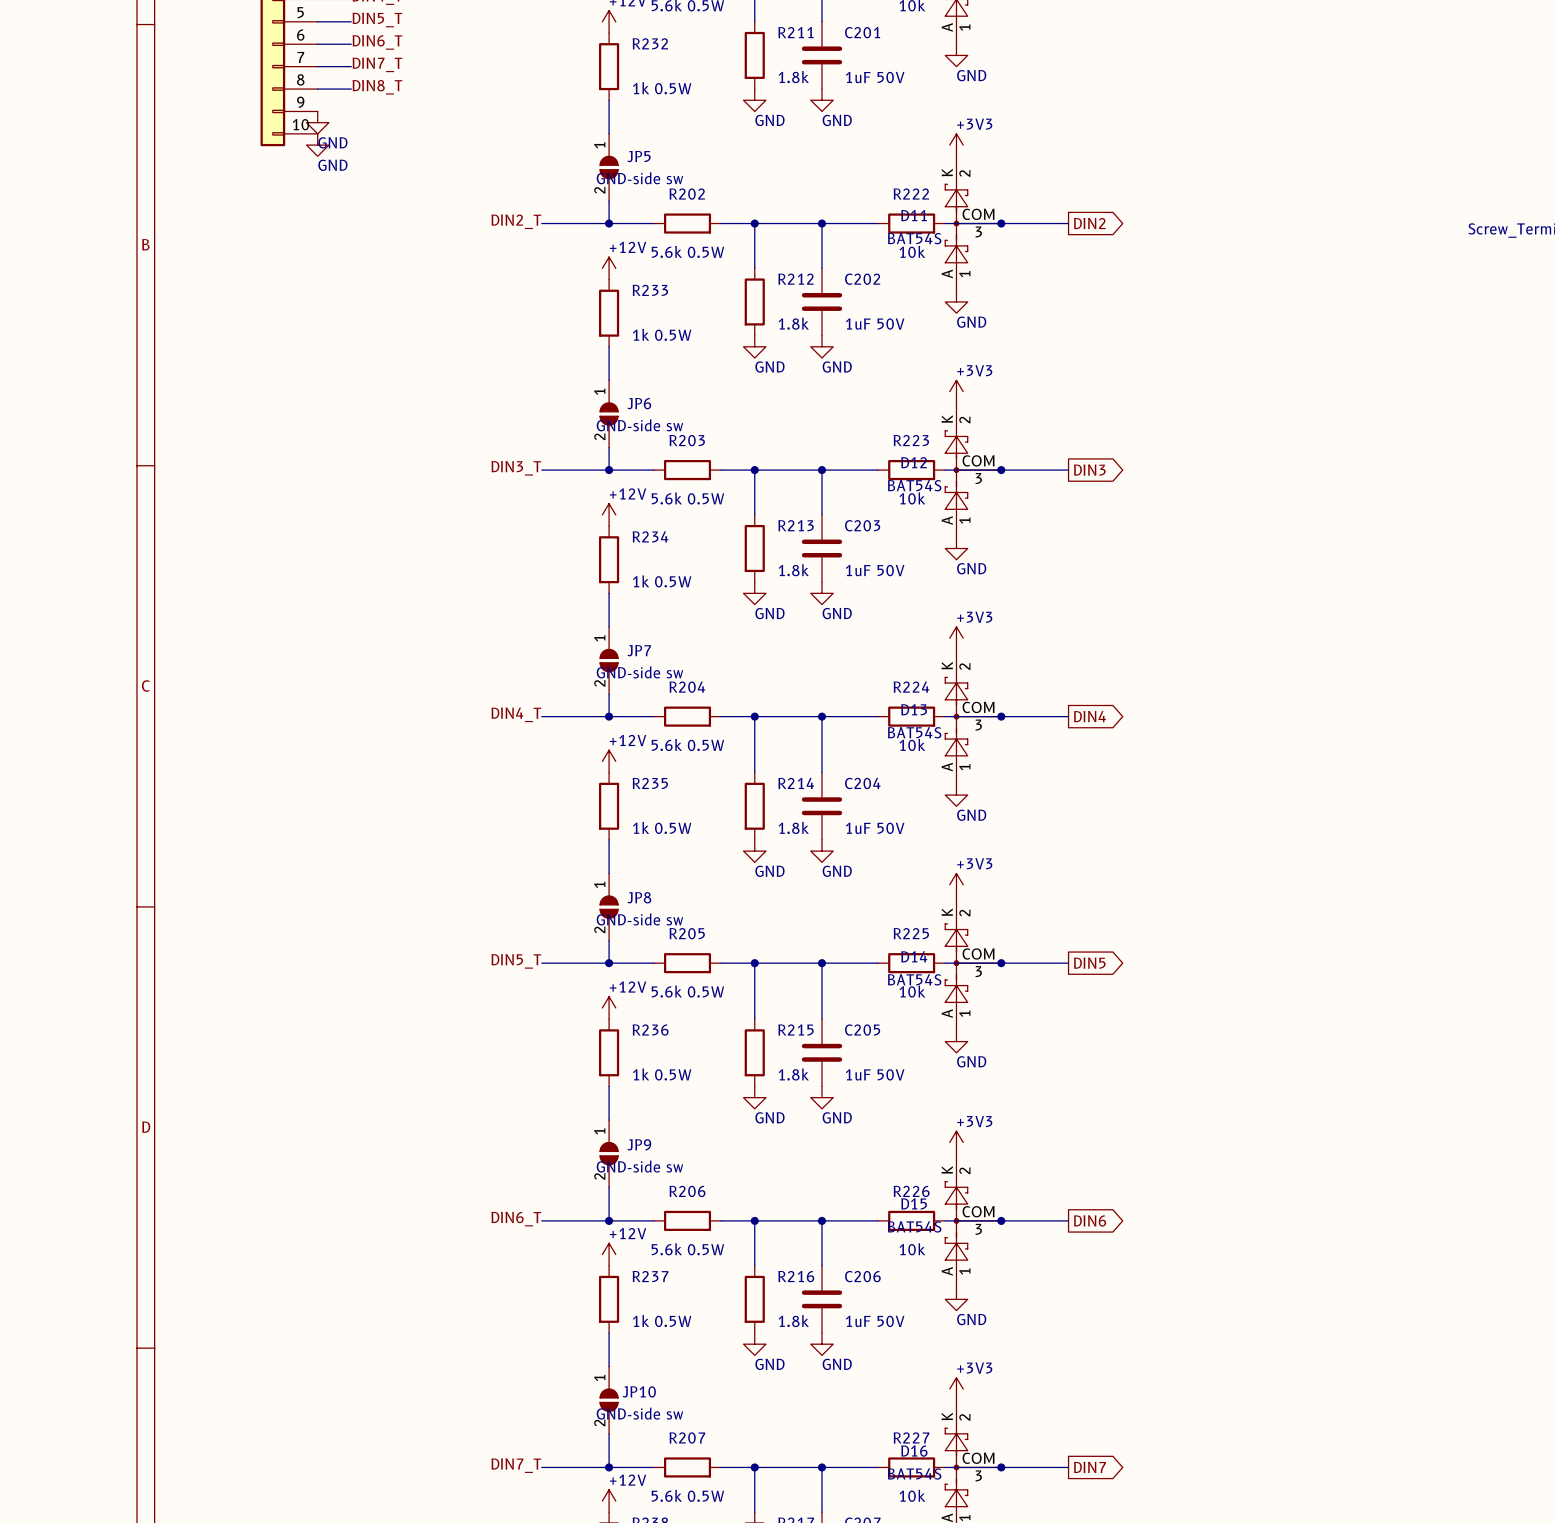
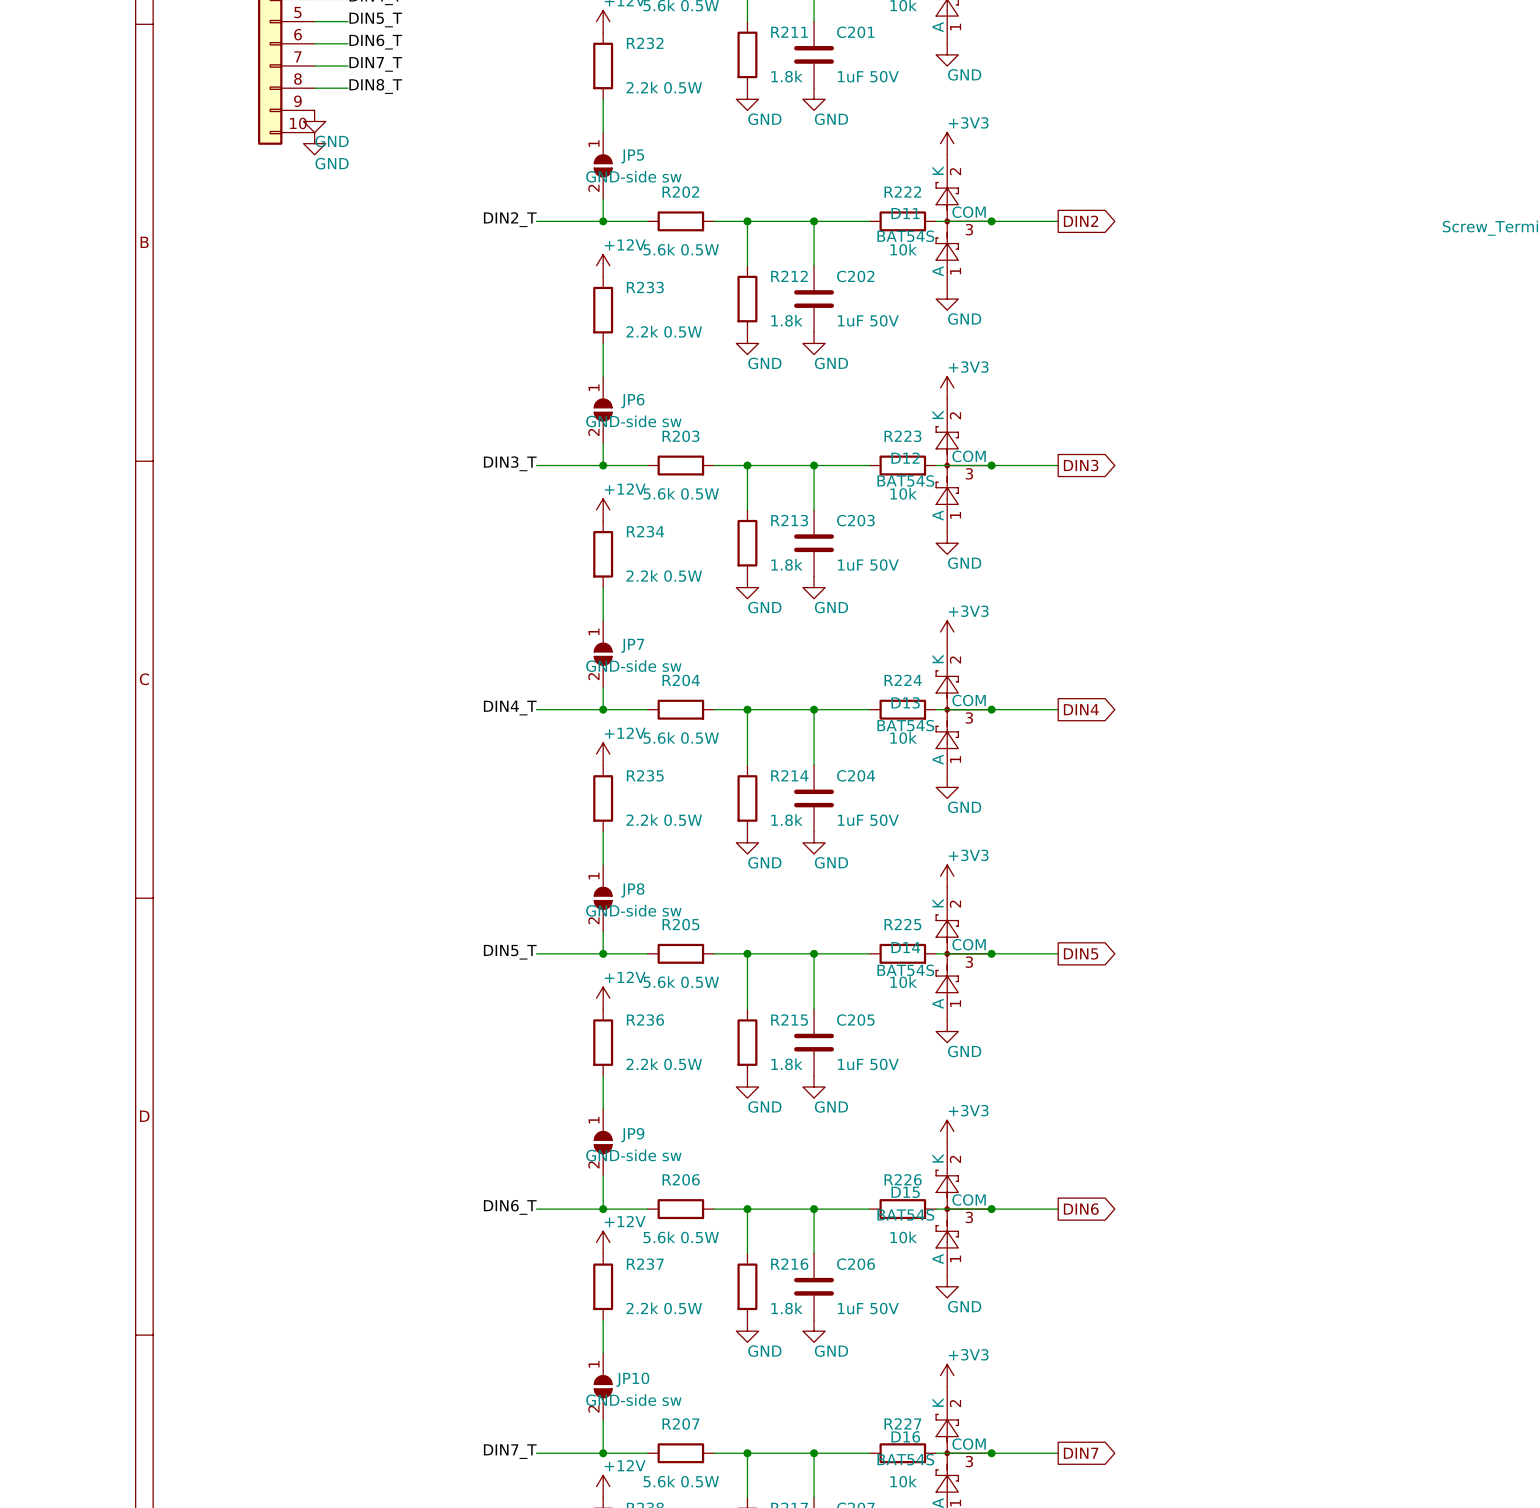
R232 value: 1k 0.5W (662, 88) -> 2.2k 0.5W (664, 87)
R233 value: 1k 0.5W (662, 334) -> 2.2k 0.5W (664, 331)
R234 value: 1k 0.5W (662, 581) -> 2.2k 0.5W (664, 575)
R235 value: 1k 0.5W (662, 827) -> 2.2k 0.5W (664, 820)
R236 value: 1k 0.5W (662, 1074) -> 2.2k 0.5W (664, 1064)
R237 value: 1k 0.5W (662, 1321) -> 2.2k 0.5W (664, 1308)

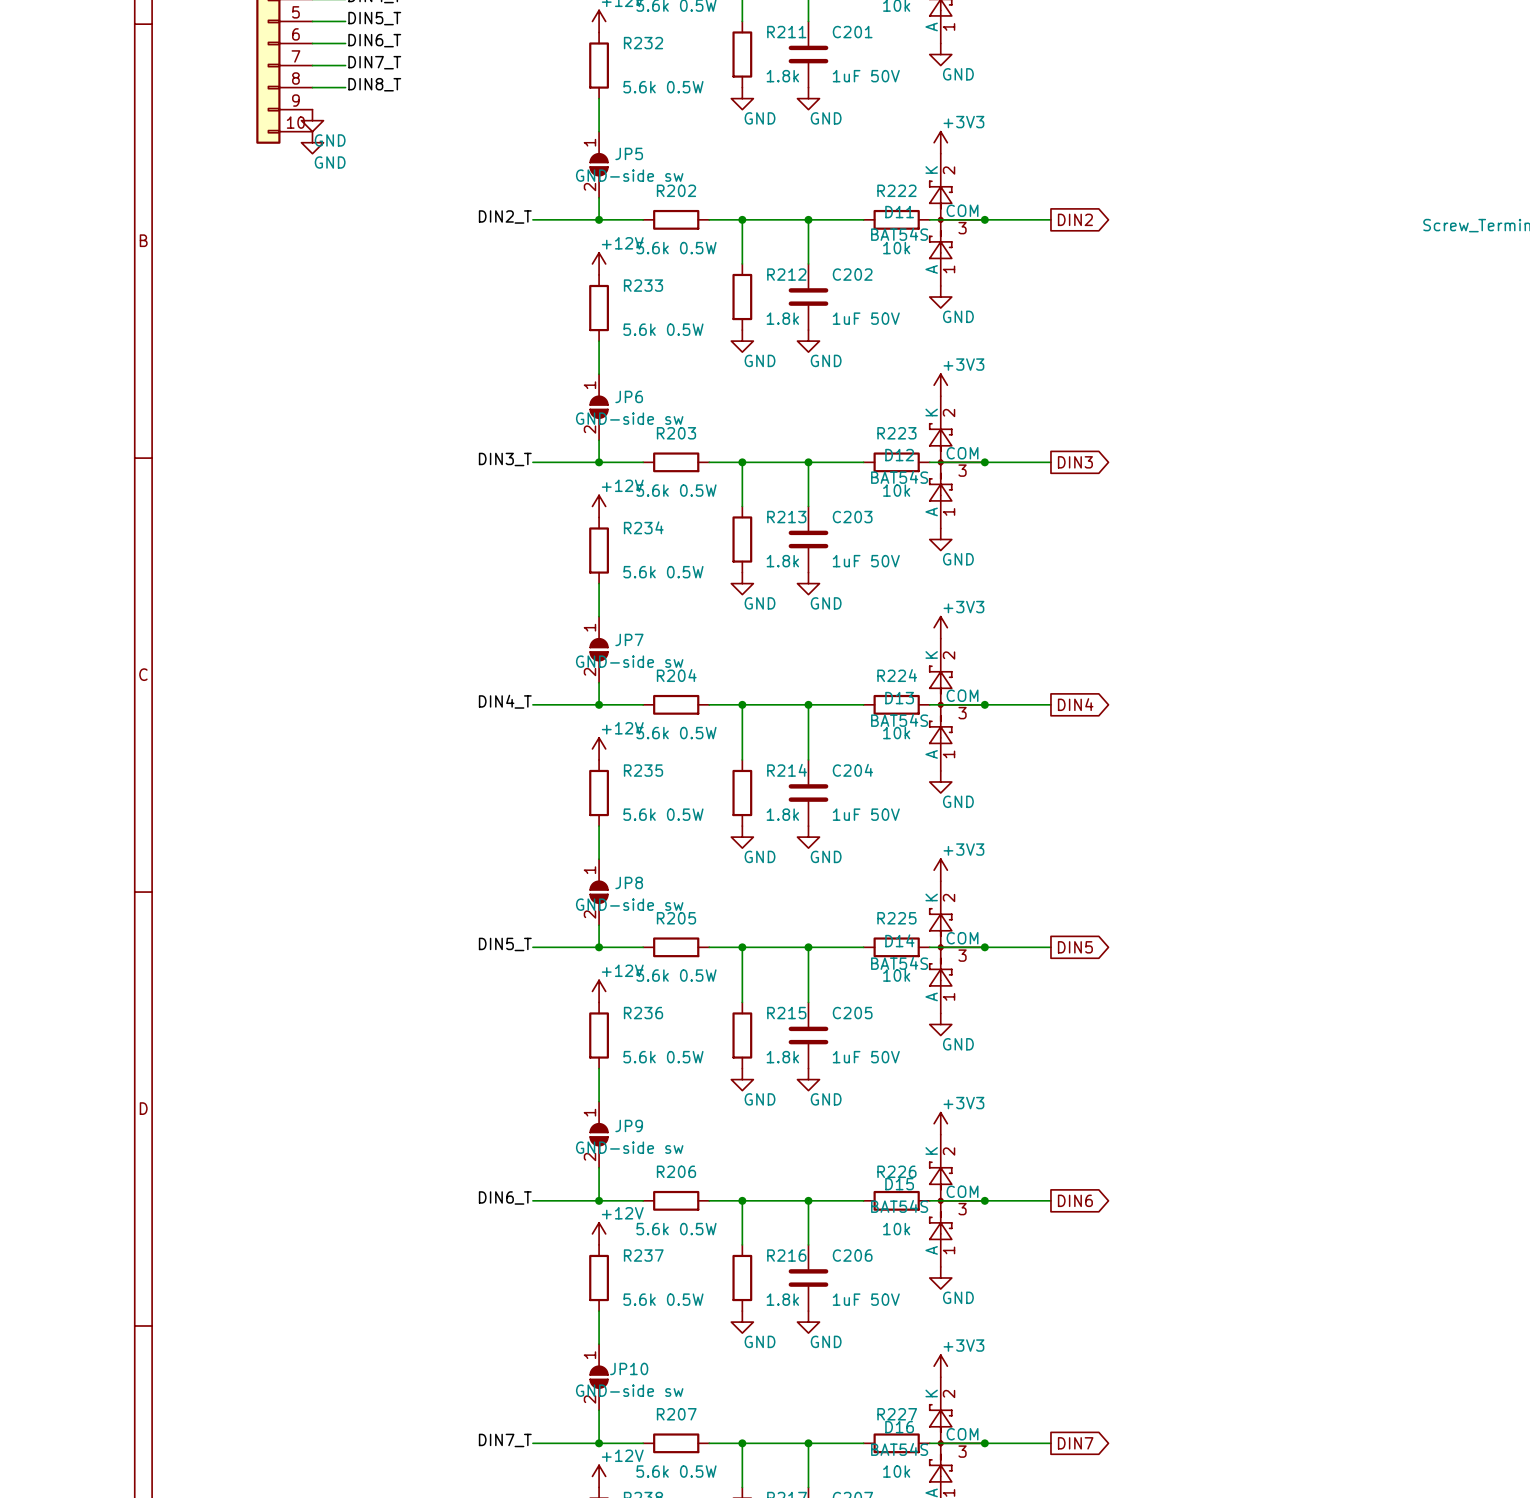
R232 value: 2.2k 0.5W (664, 87) -> 5.6k 0.5W (663, 87)
R233 value: 2.2k 0.5W (664, 331) -> 5.6k 0.5W (663, 329)
R234 value: 2.2k 0.5W (664, 575) -> 5.6k 0.5W (663, 572)
R235 value: 2.2k 0.5W (664, 820) -> 5.6k 0.5W (663, 814)
R236 value: 2.2k 0.5W (664, 1064) -> 5.6k 0.5W (663, 1057)
R237 value: 2.2k 0.5W (664, 1308) -> 5.6k 0.5W (663, 1299)

